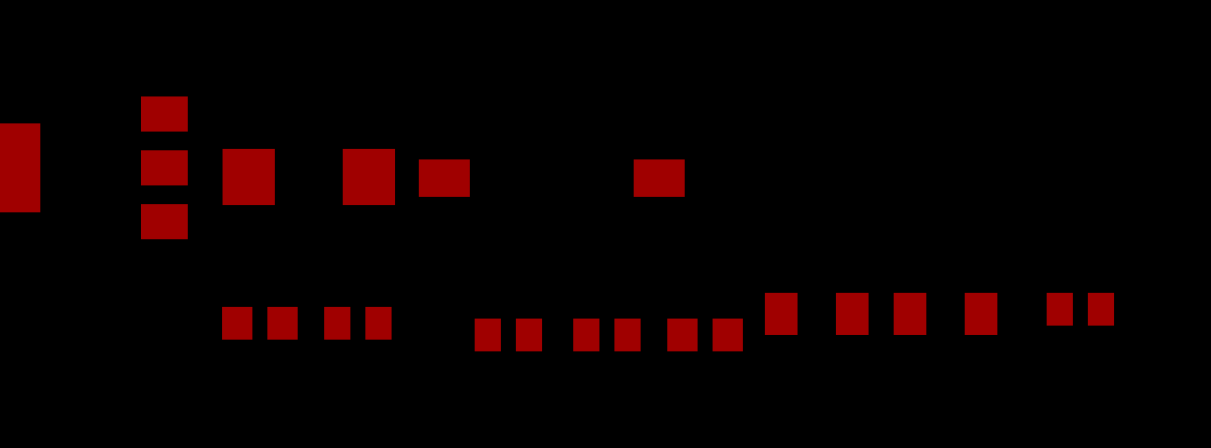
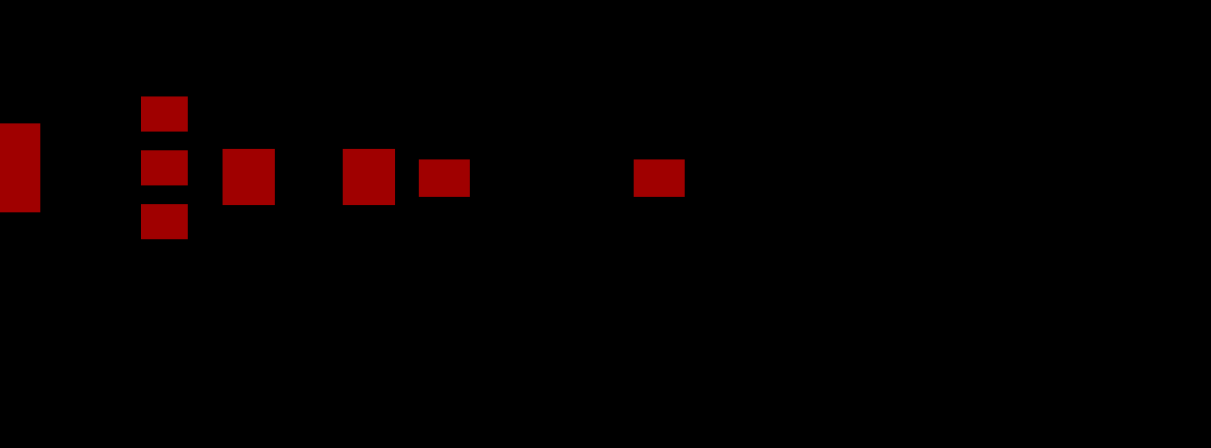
part: (1080, 309) -> none
part: (816, 313) -> none
part: (945, 313) -> none
part: (259, 323) -> none
part: (357, 323) -> none
part: (508, 334) -> none
part: (606, 334) -> none
part: (705, 334) -> none

